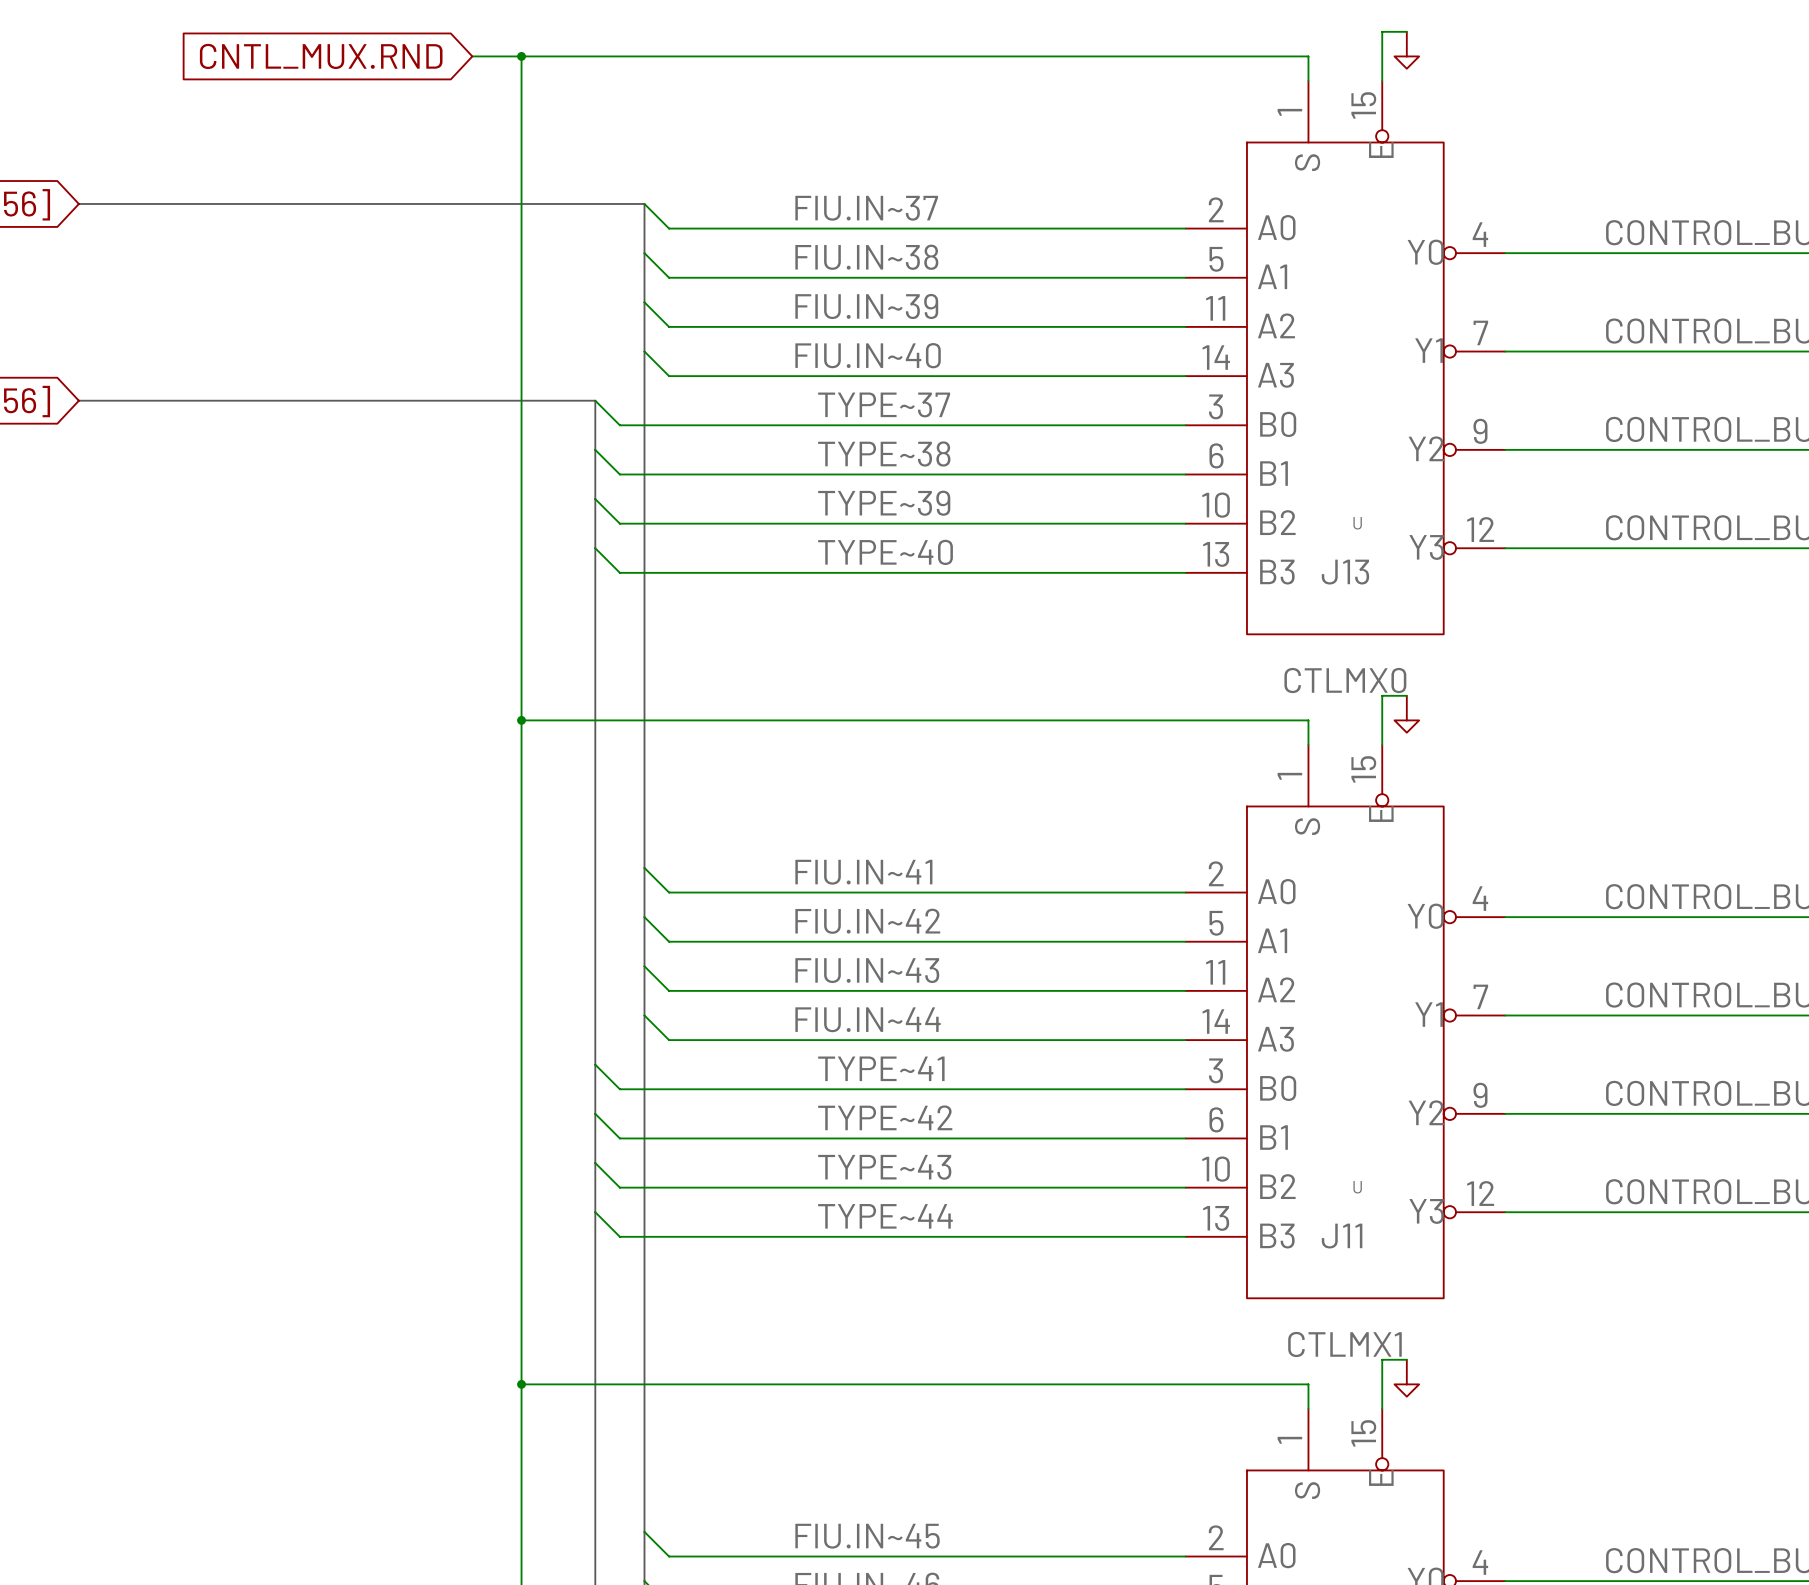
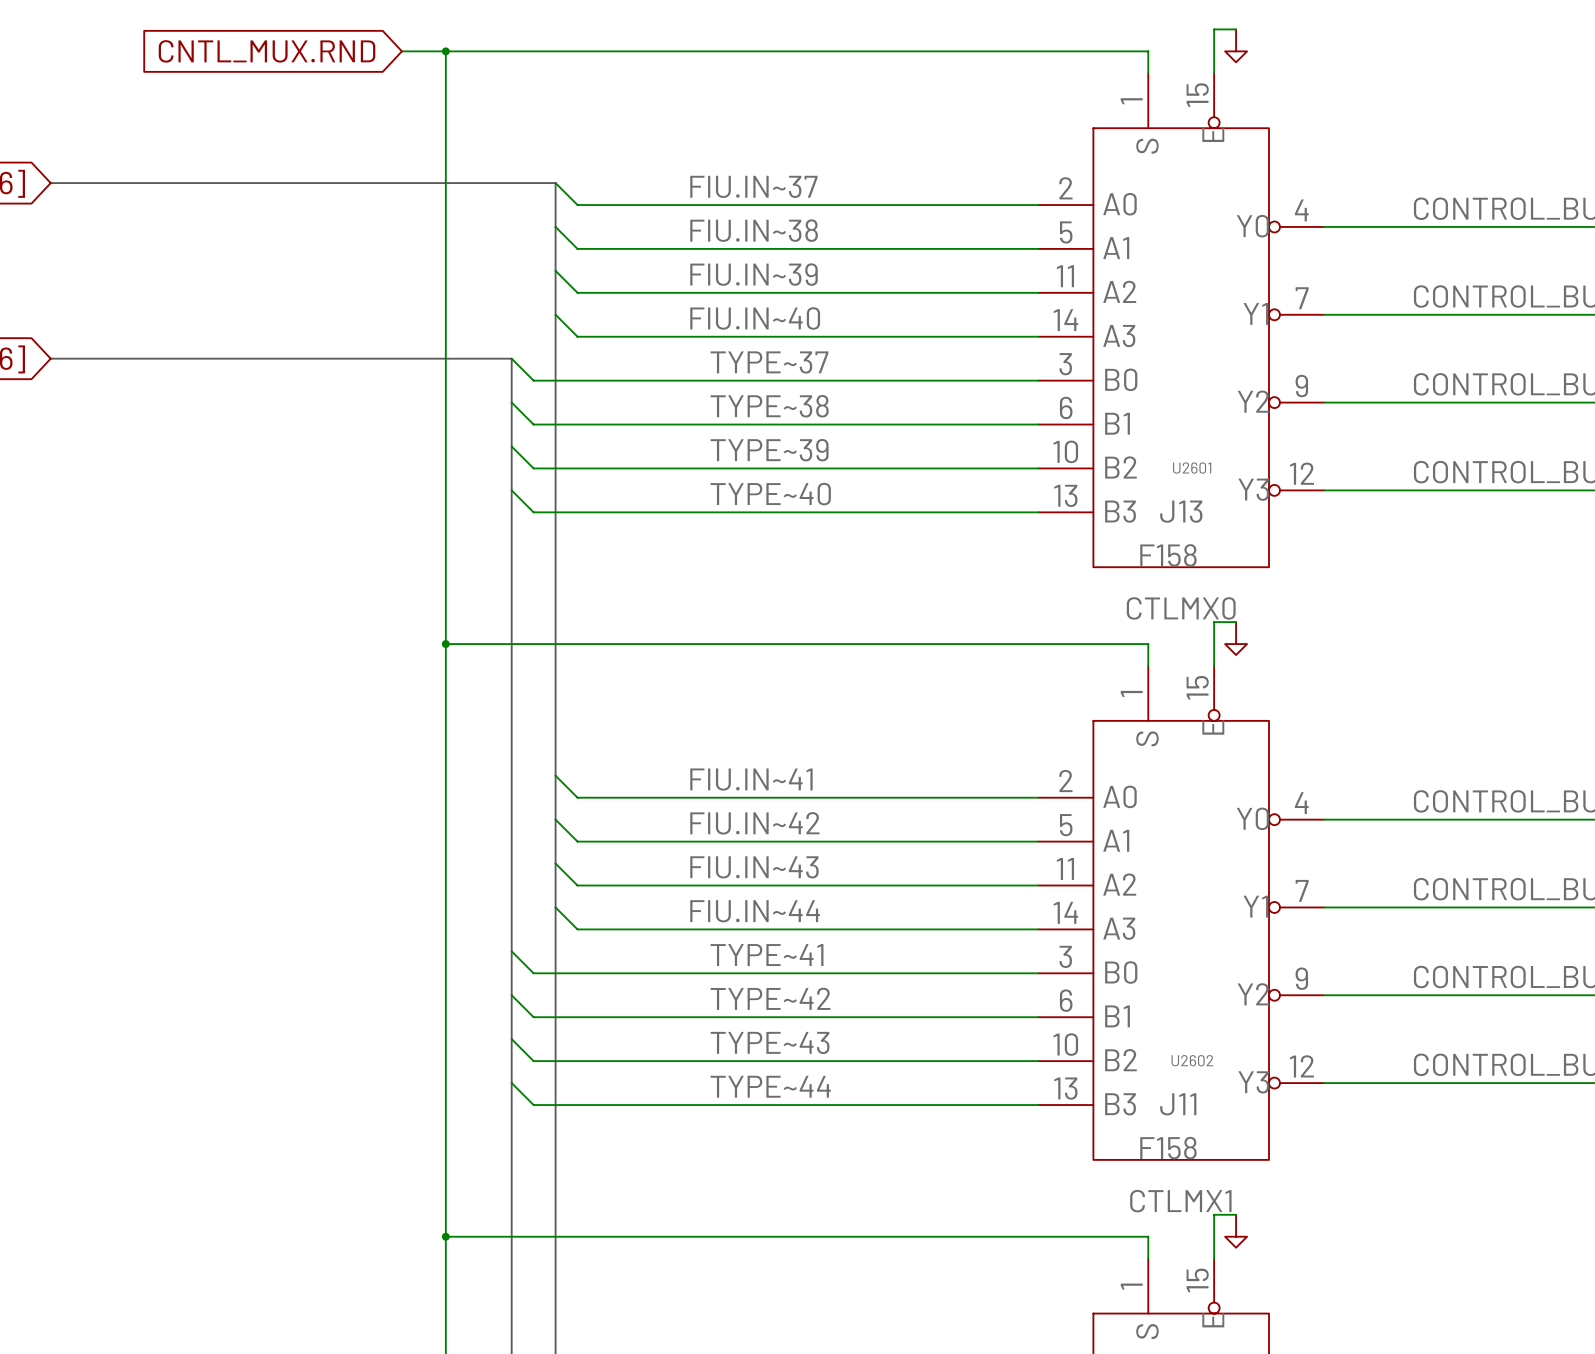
U name: U (1357, 523) -> U2601 (1192, 468)
U value: none -> F158 (1168, 555)
U name: U (1357, 1187) -> U2602 (1192, 1060)
U value: none -> F158 (1168, 1148)

